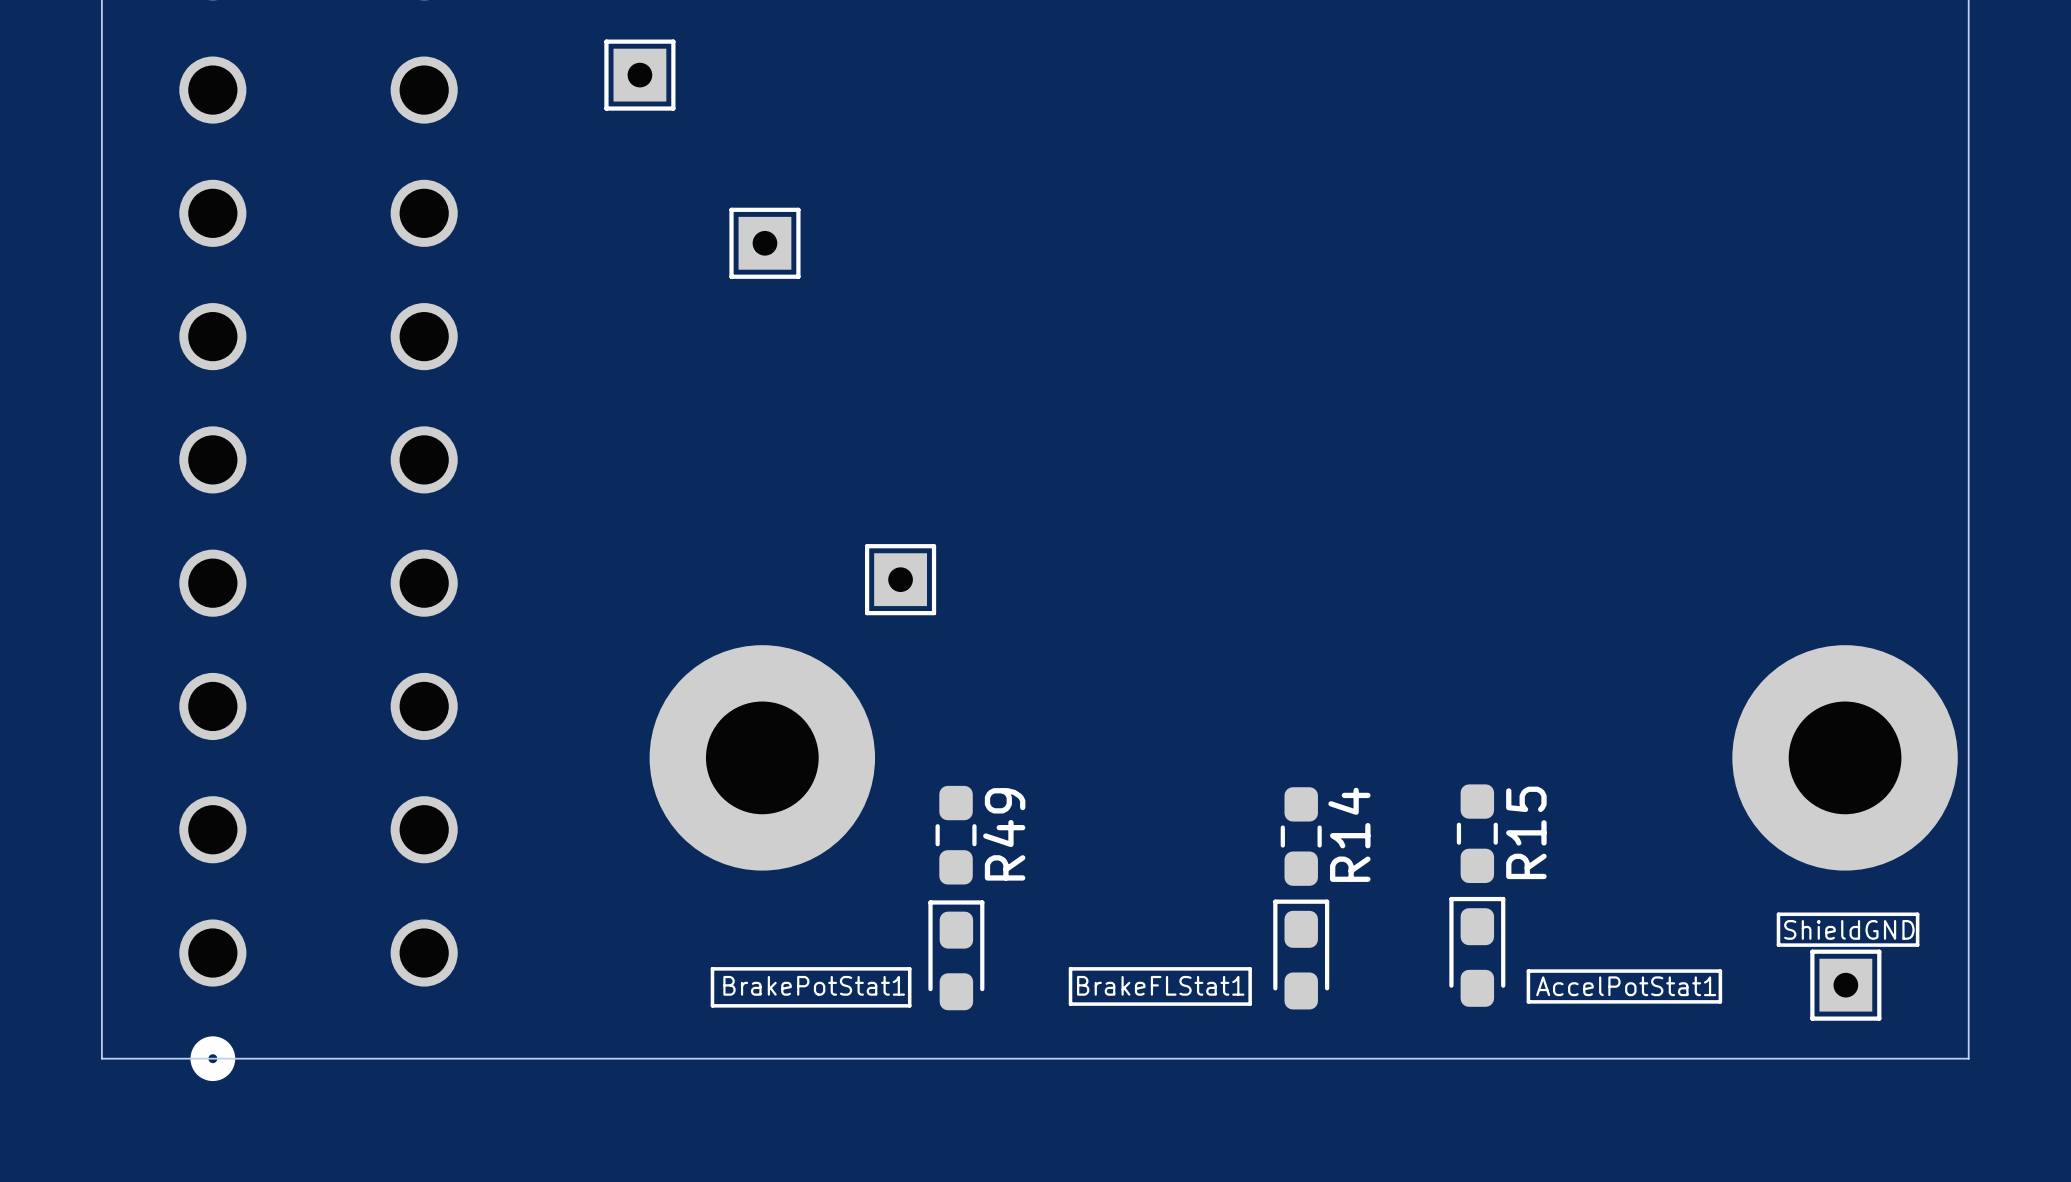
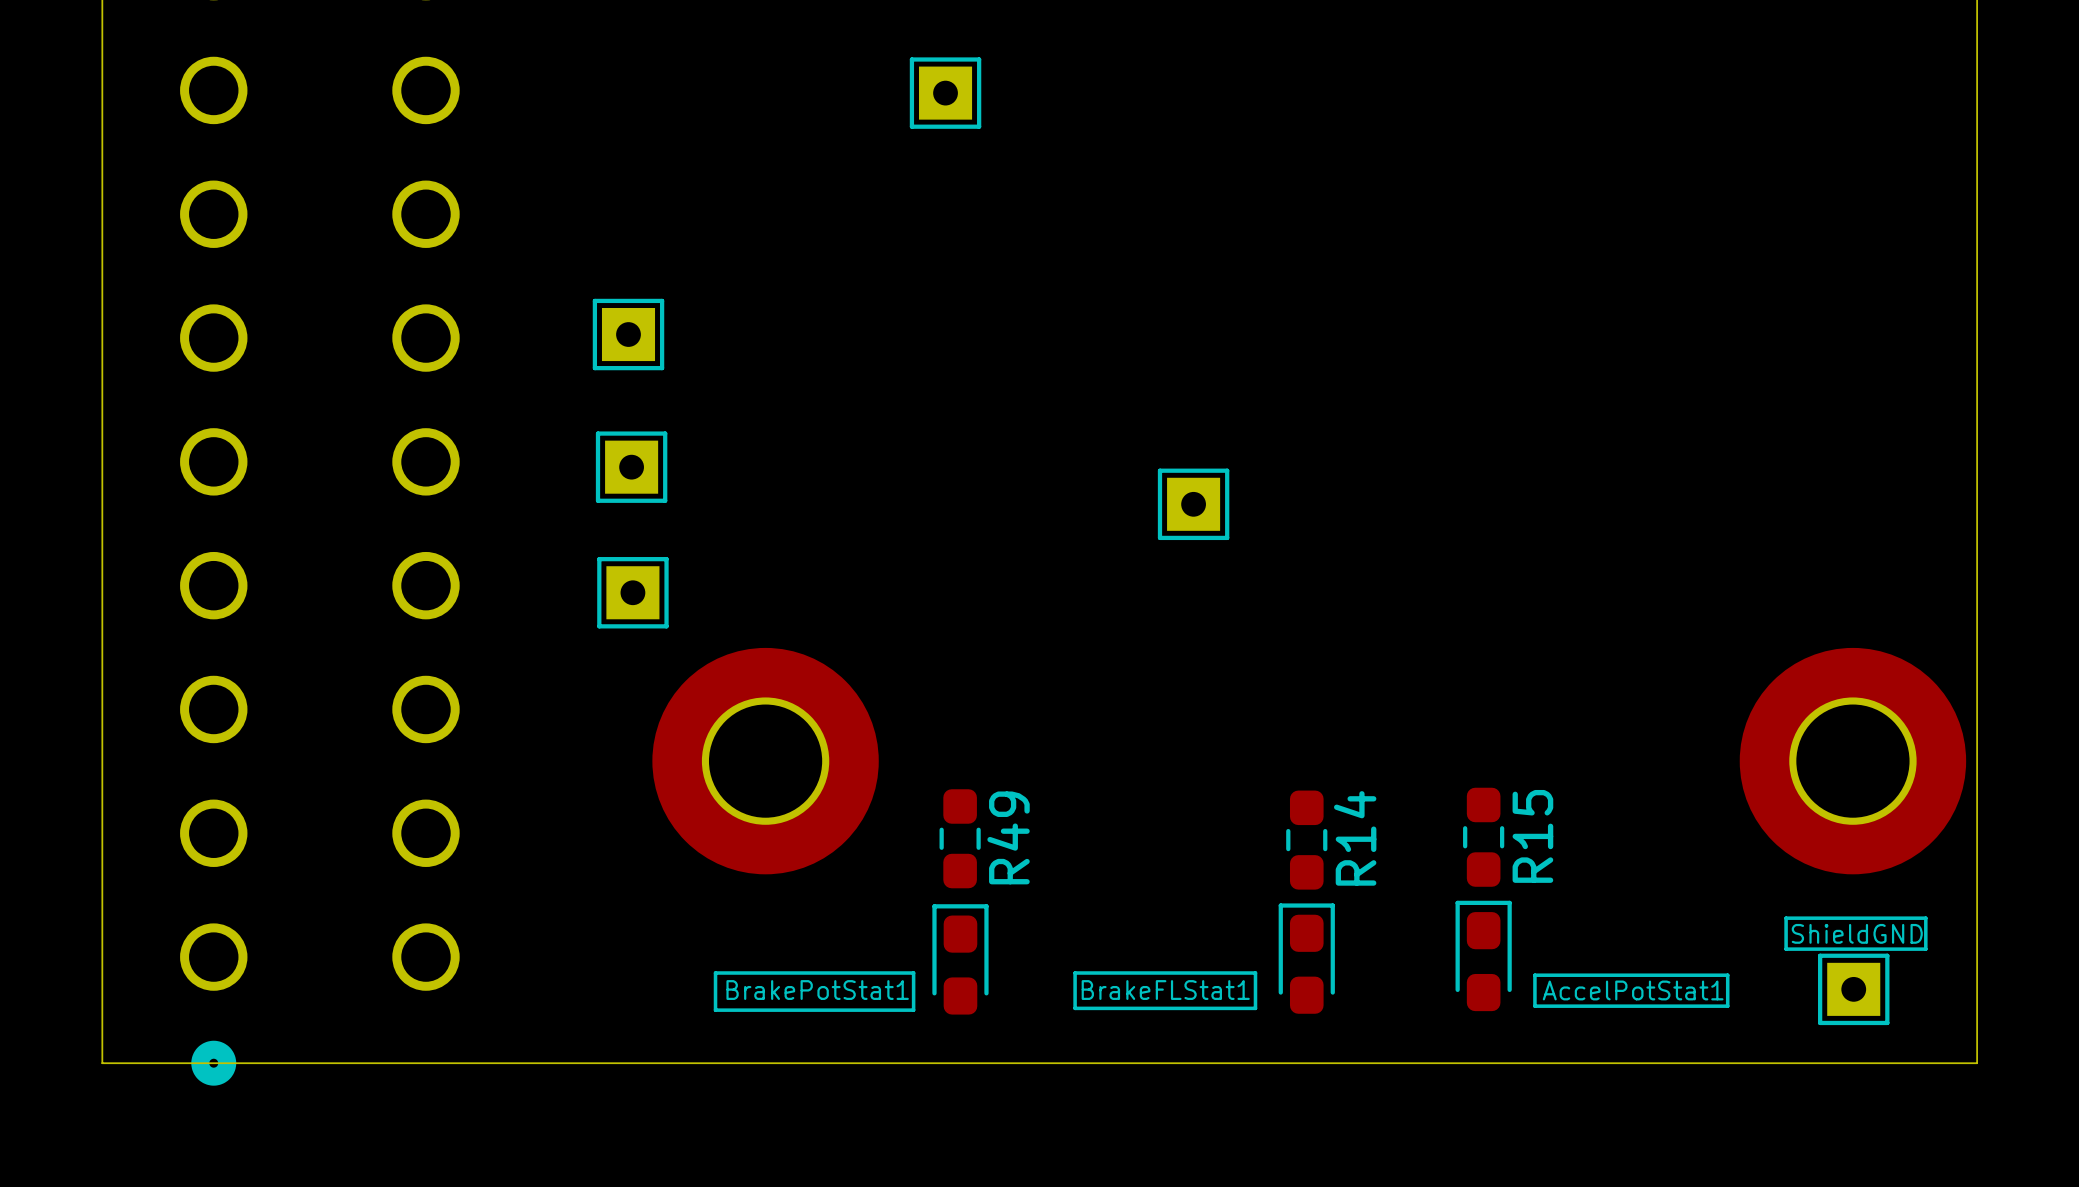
part: (639, 75) -> none
part: none -> (945, 93)
part: (764, 243) -> none
part: none -> (628, 334)
part: none -> (631, 467)
part: none -> (1193, 504)
part: (900, 579) -> none
part: none -> (632, 592)

